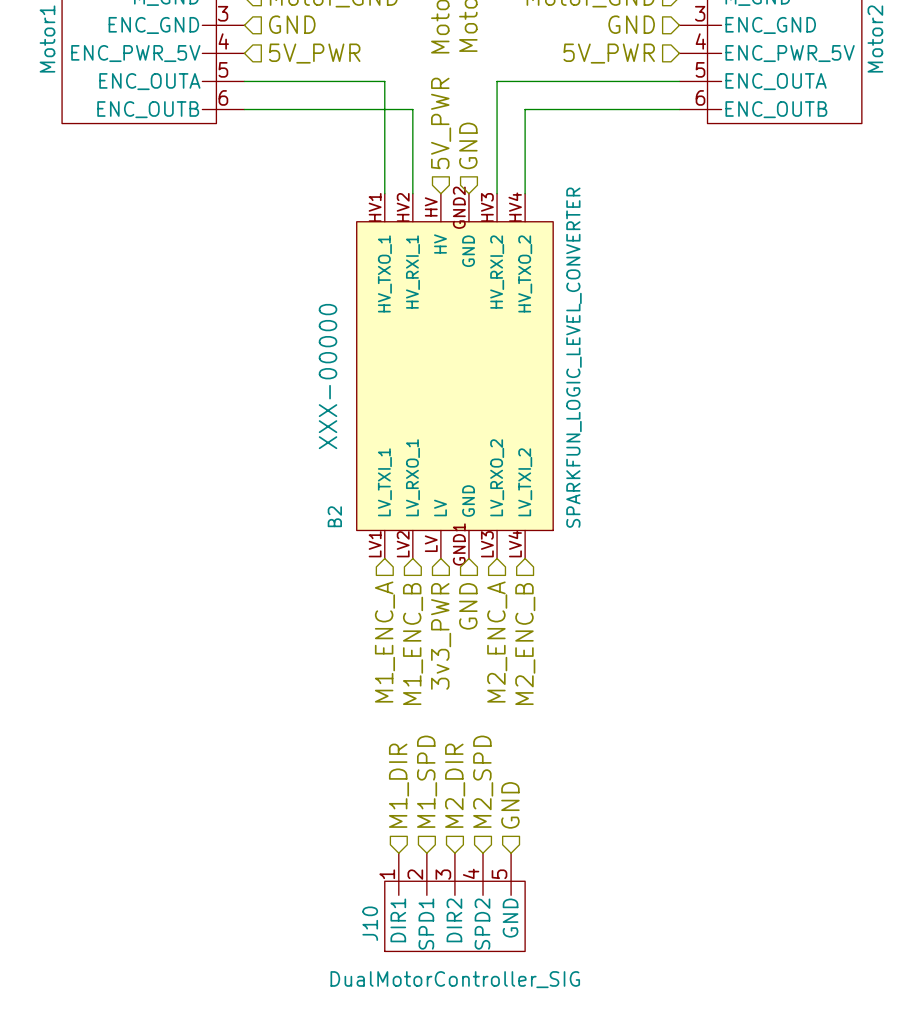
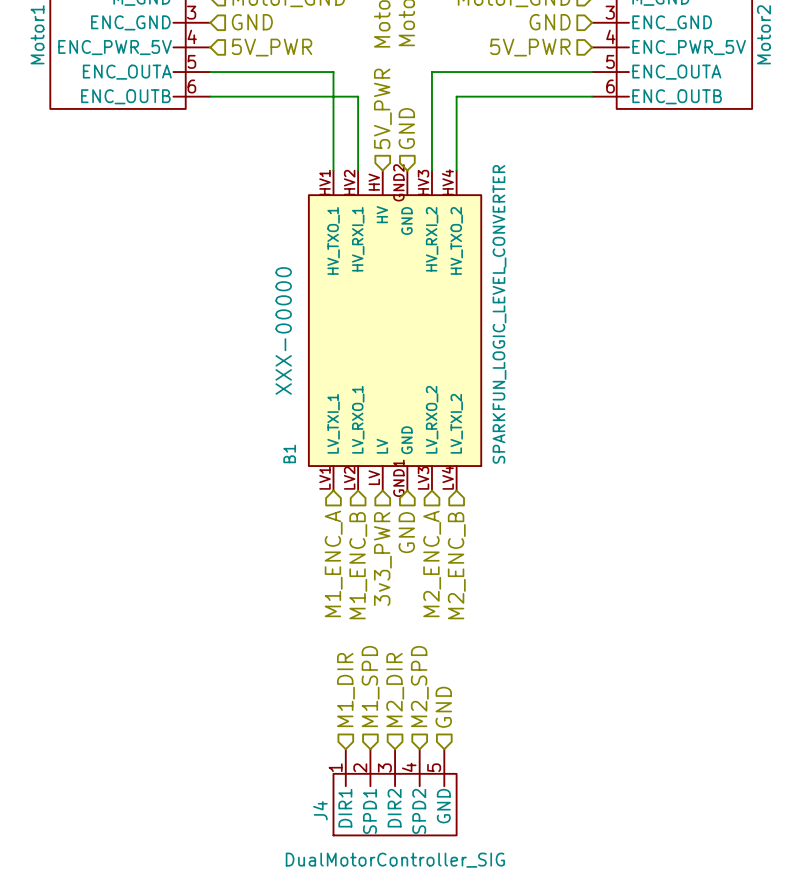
B2 name: B2 (334, 516) -> B1 (289, 453)
J10 name: J10 (370, 923) -> J4 (320, 810)

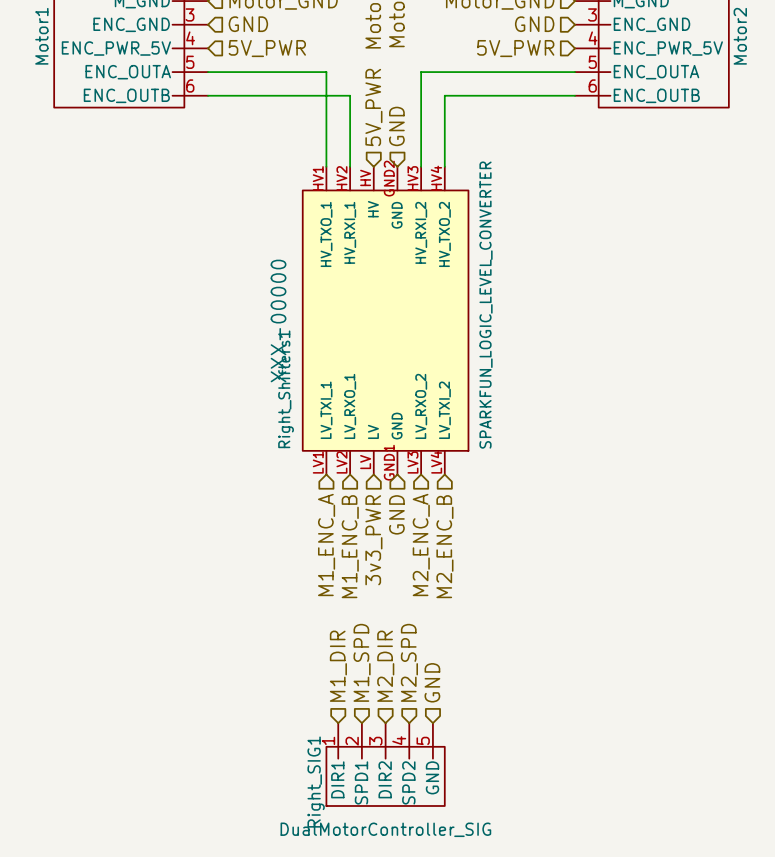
B1 name: B1 (289, 453) -> Right_Shifters1 (286, 389)
J4 name: J4 (320, 810) -> Right_SIG1 (316, 782)

